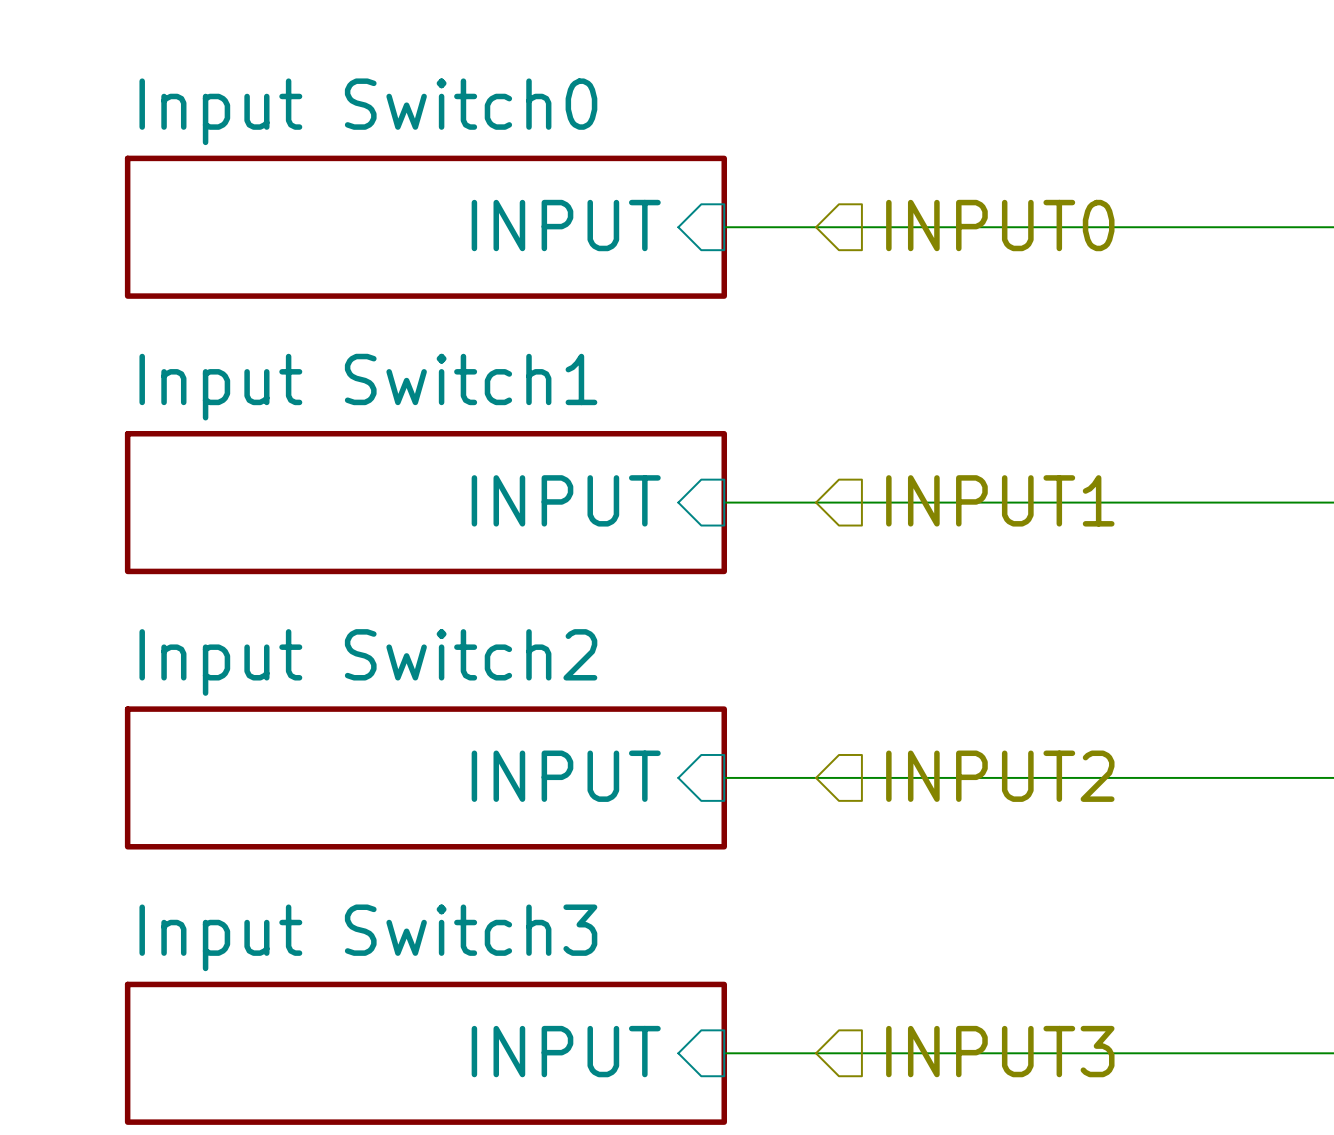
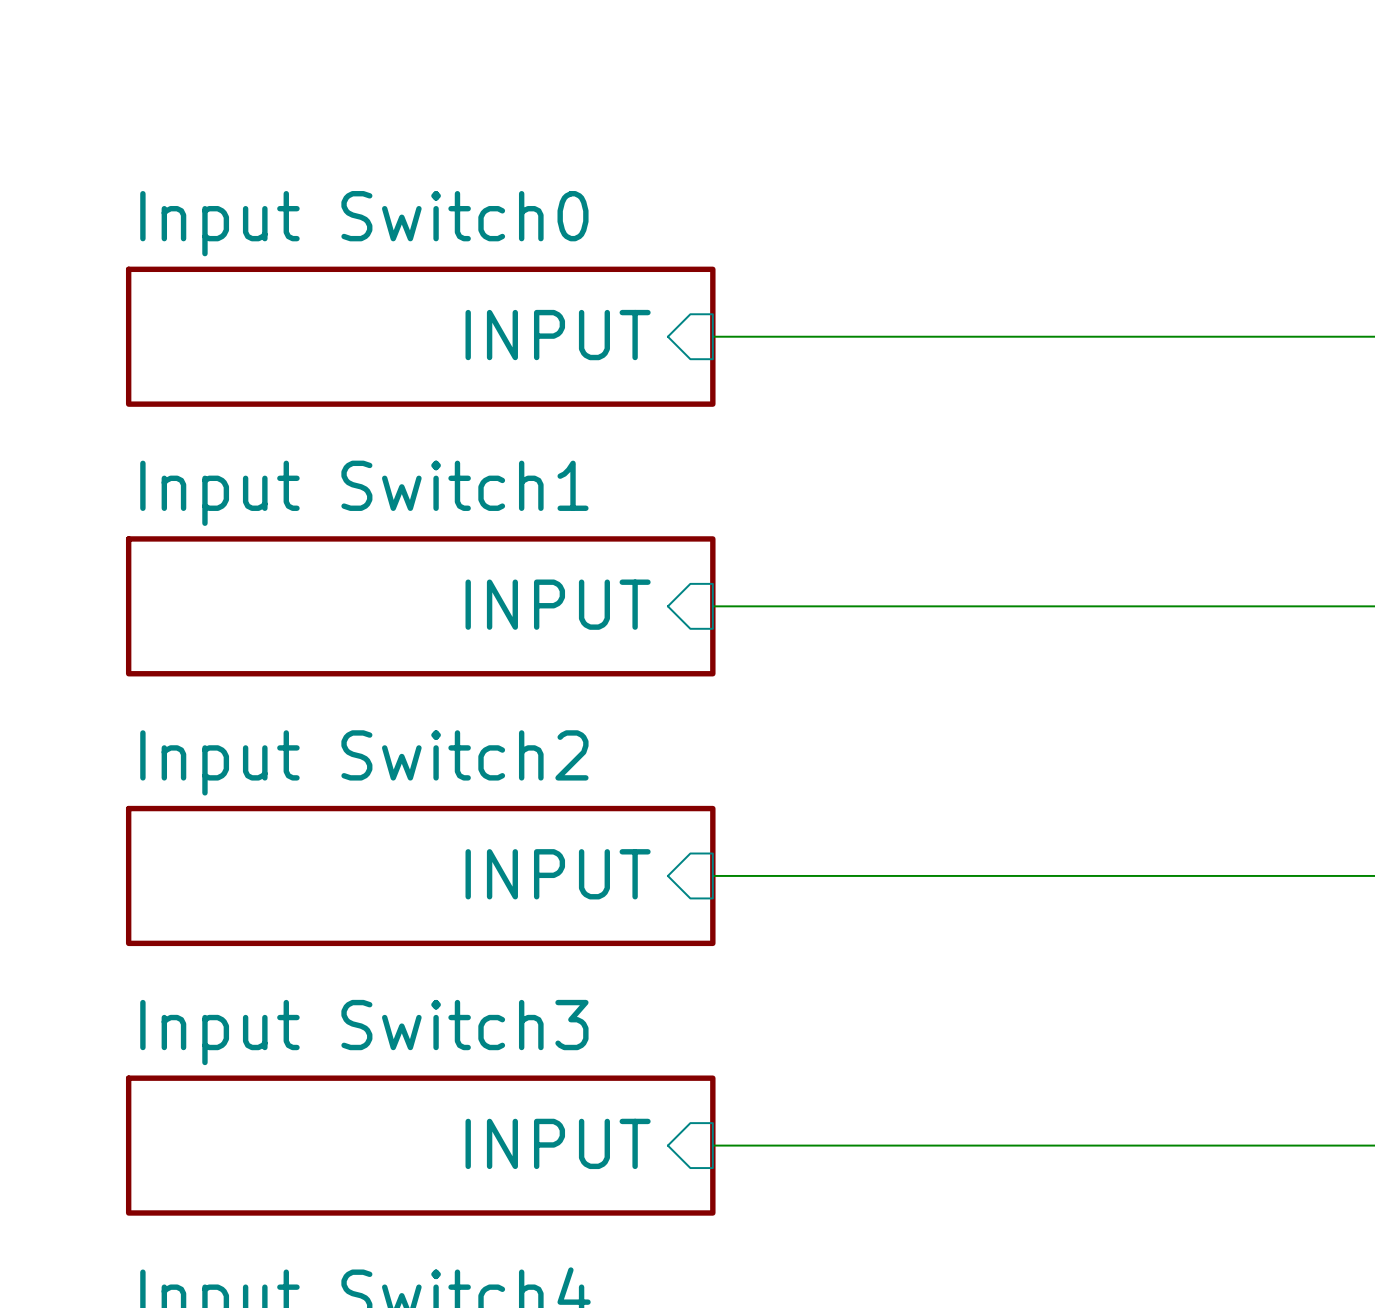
hierarchical label: INPUT0 (1000, 225) -> none
hierarchical label: INPUT1 (1000, 500) -> none
hierarchical label: INPUT2 (1000, 776) -> none
hierarchical label: INPUT3 (1000, 1051) -> none

